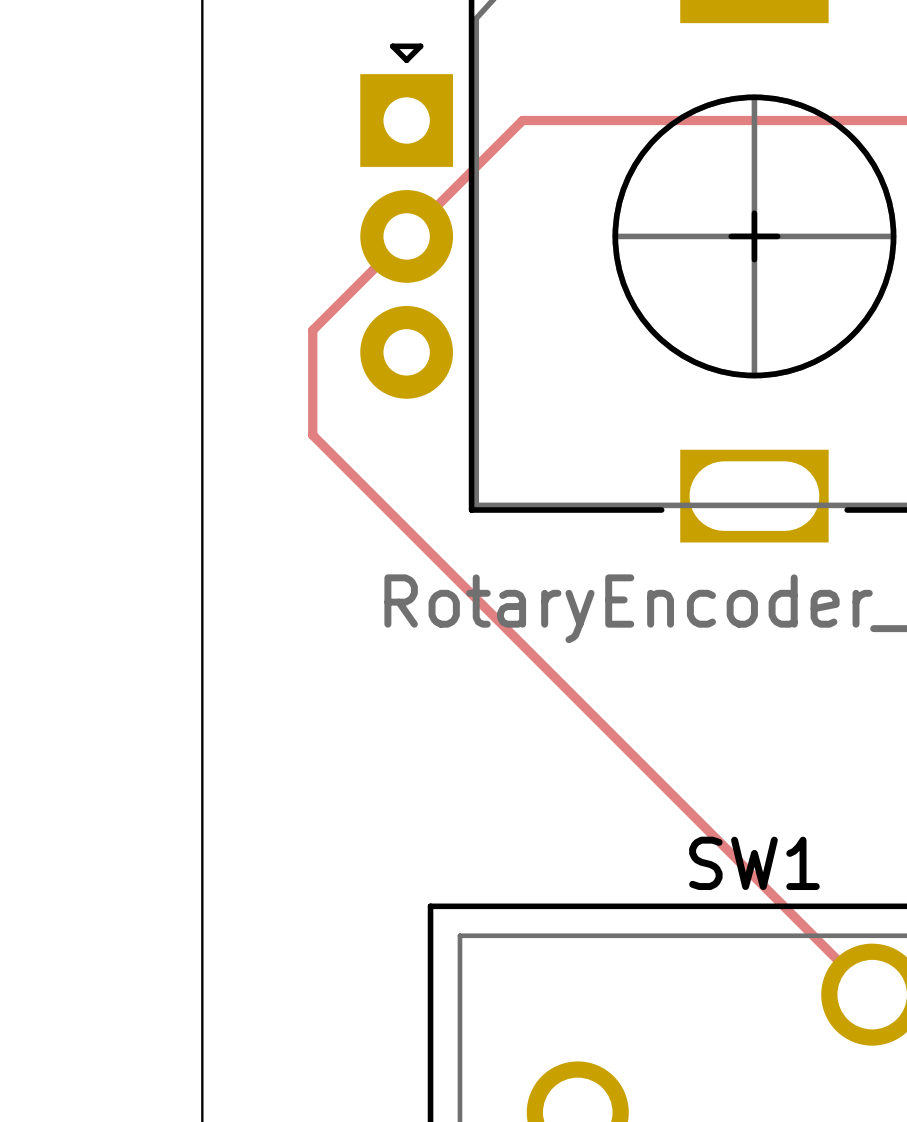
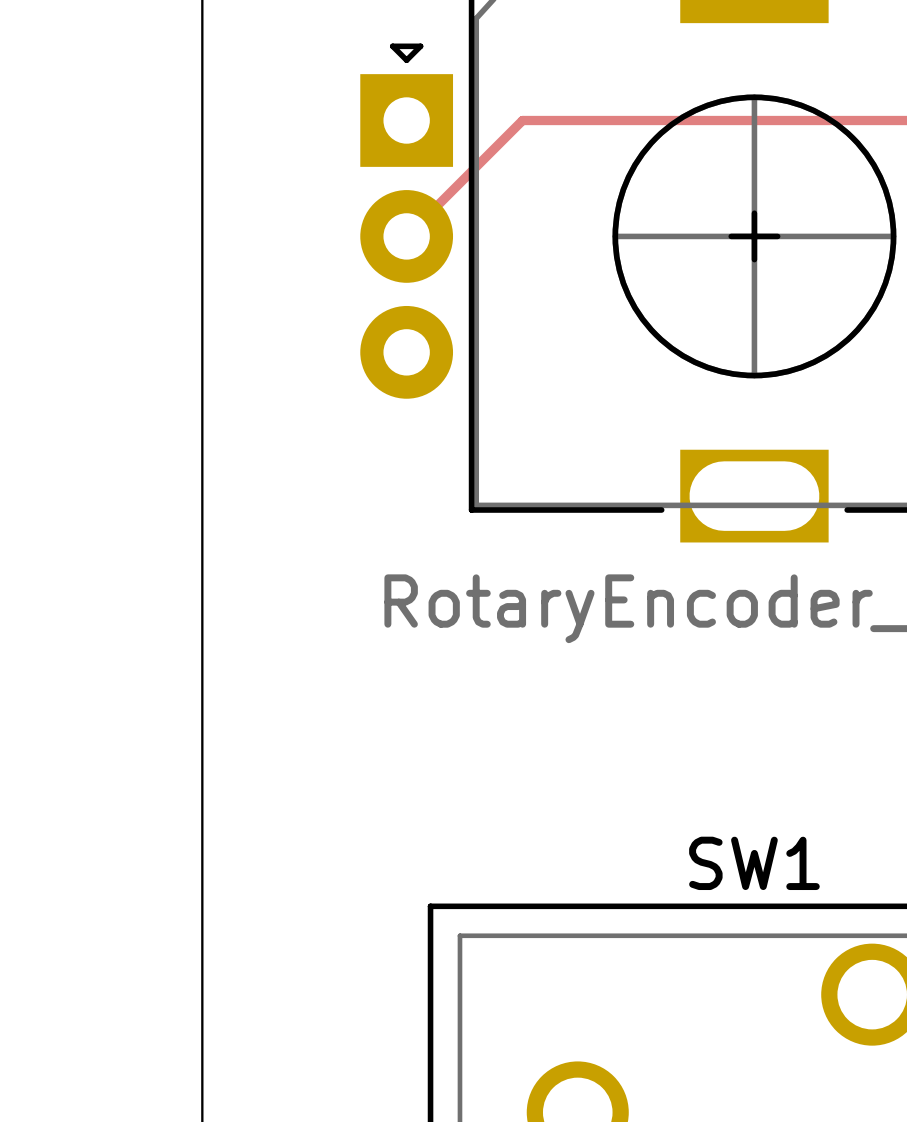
track: (406, 236) (312, 330) (312, 435) (872, 994) -> none

